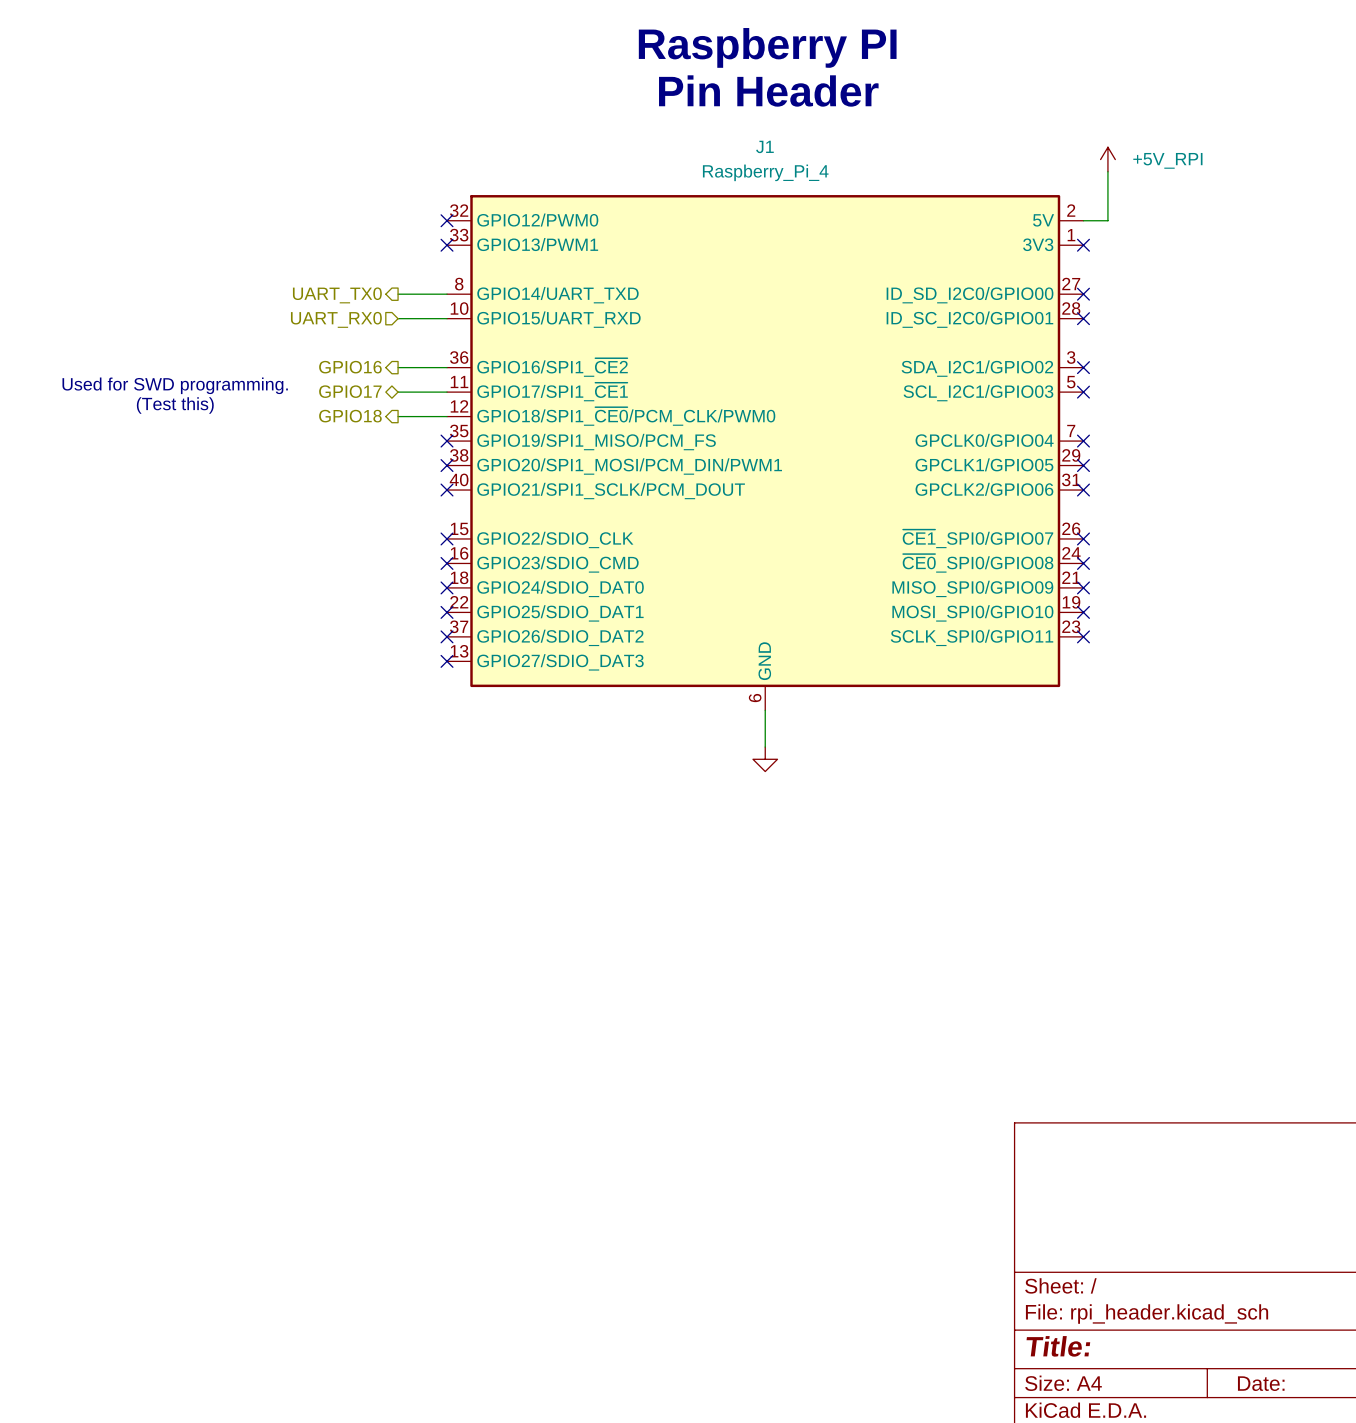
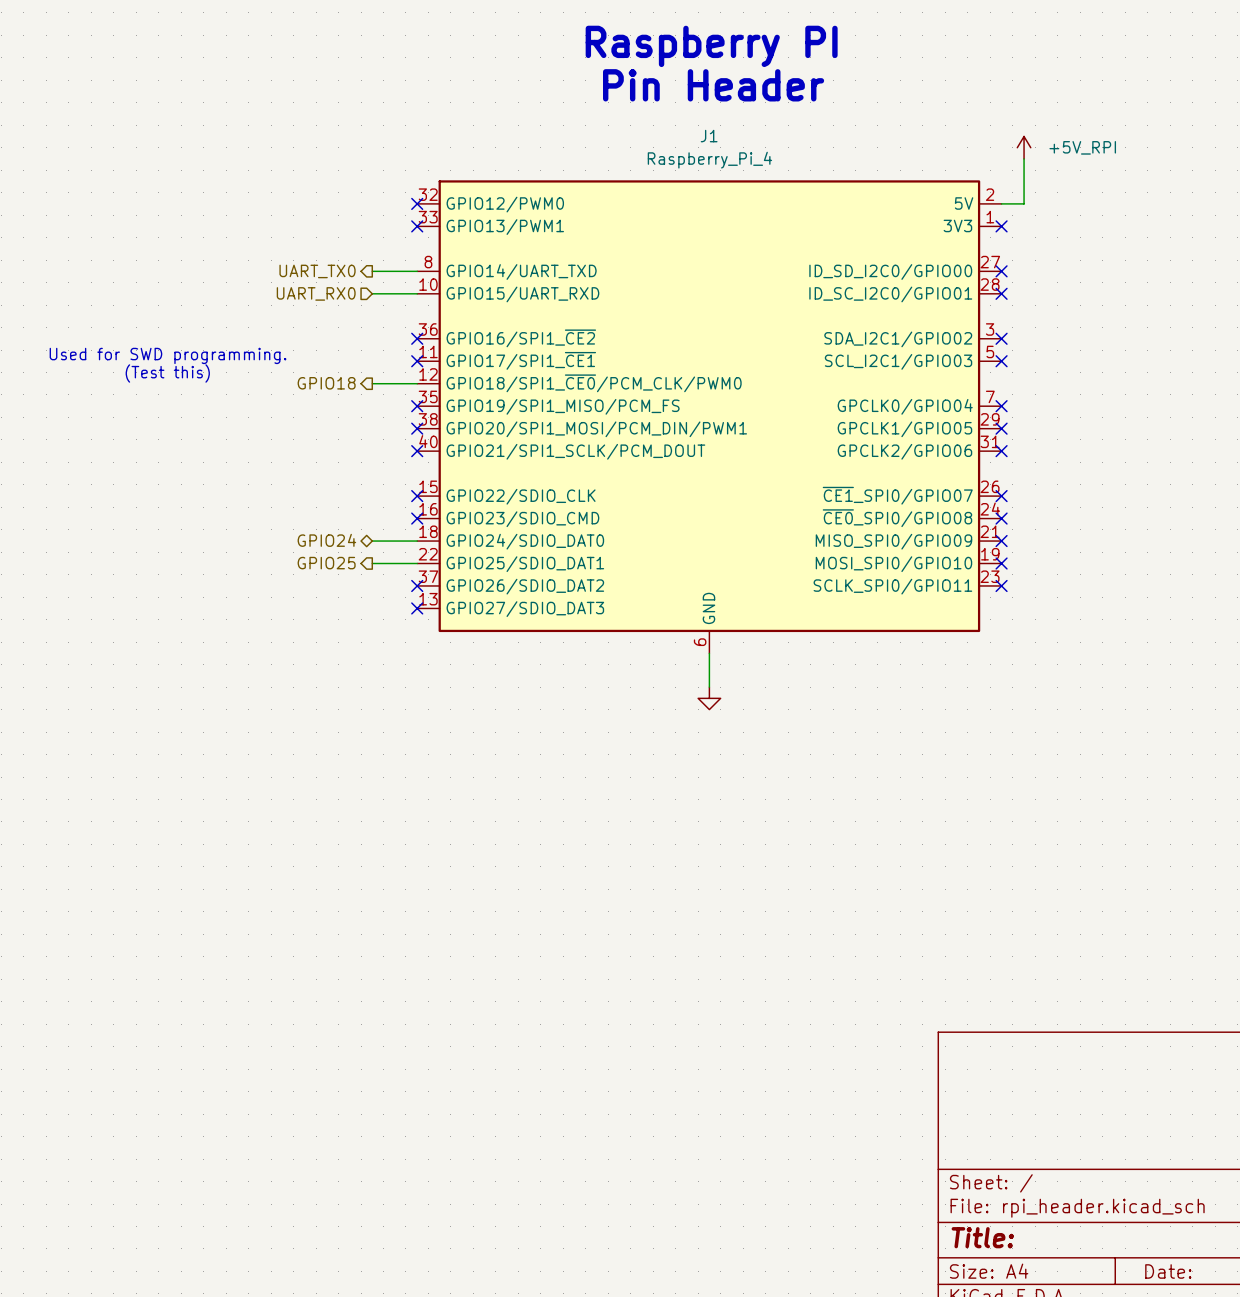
hierarchical label: GPIO16 (350, 367) -> none
wire: (398, 367) (447, 367) -> none
no-connect mark: none -> (417, 338)
hierarchical label: GPIO17 (350, 391) -> none
wire: (398, 392) (447, 392) -> (372, 541) (417, 541)
no-connect mark: none -> (417, 361)
hierarchical label: none -> GPIO24 (326, 540)
no-connect mark: (447, 587) -> none
hierarchical label: none -> GPIO25 (326, 563)
wire: none -> (372, 563) (417, 563)
no-connect mark: (447, 612) -> none

